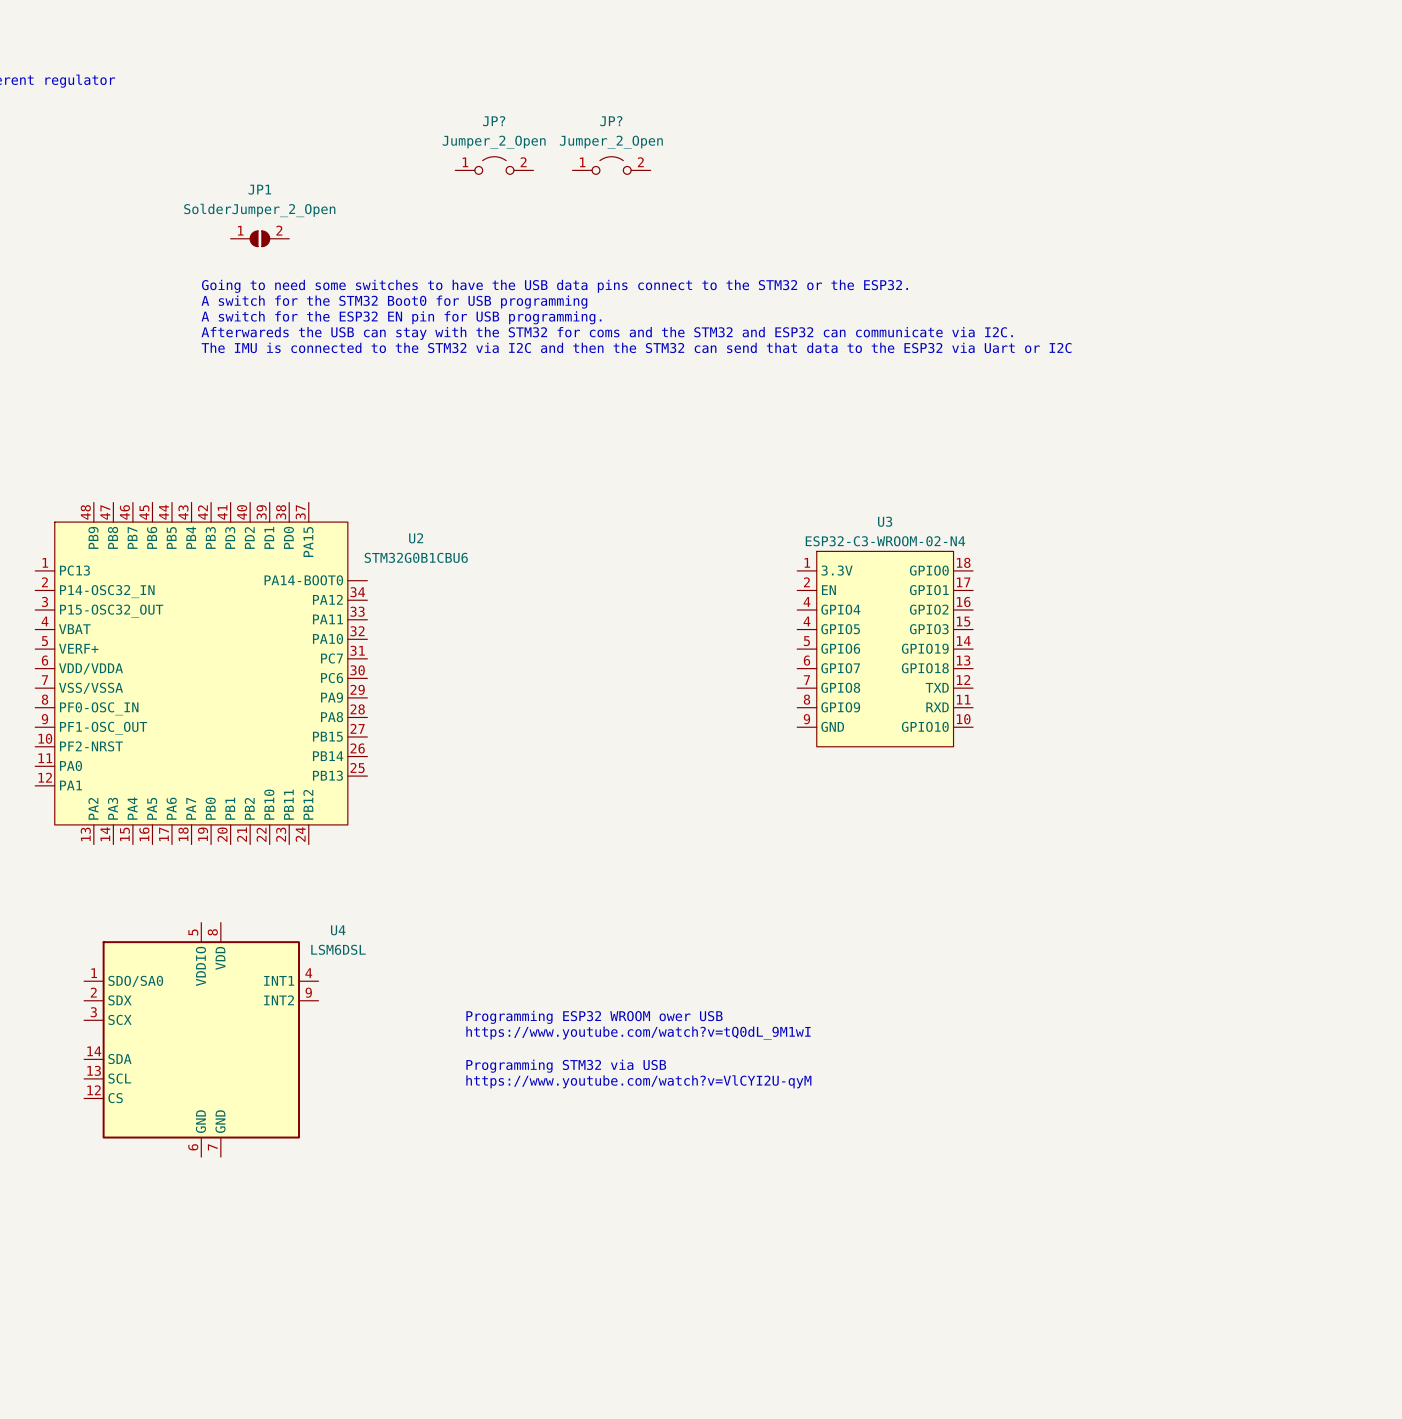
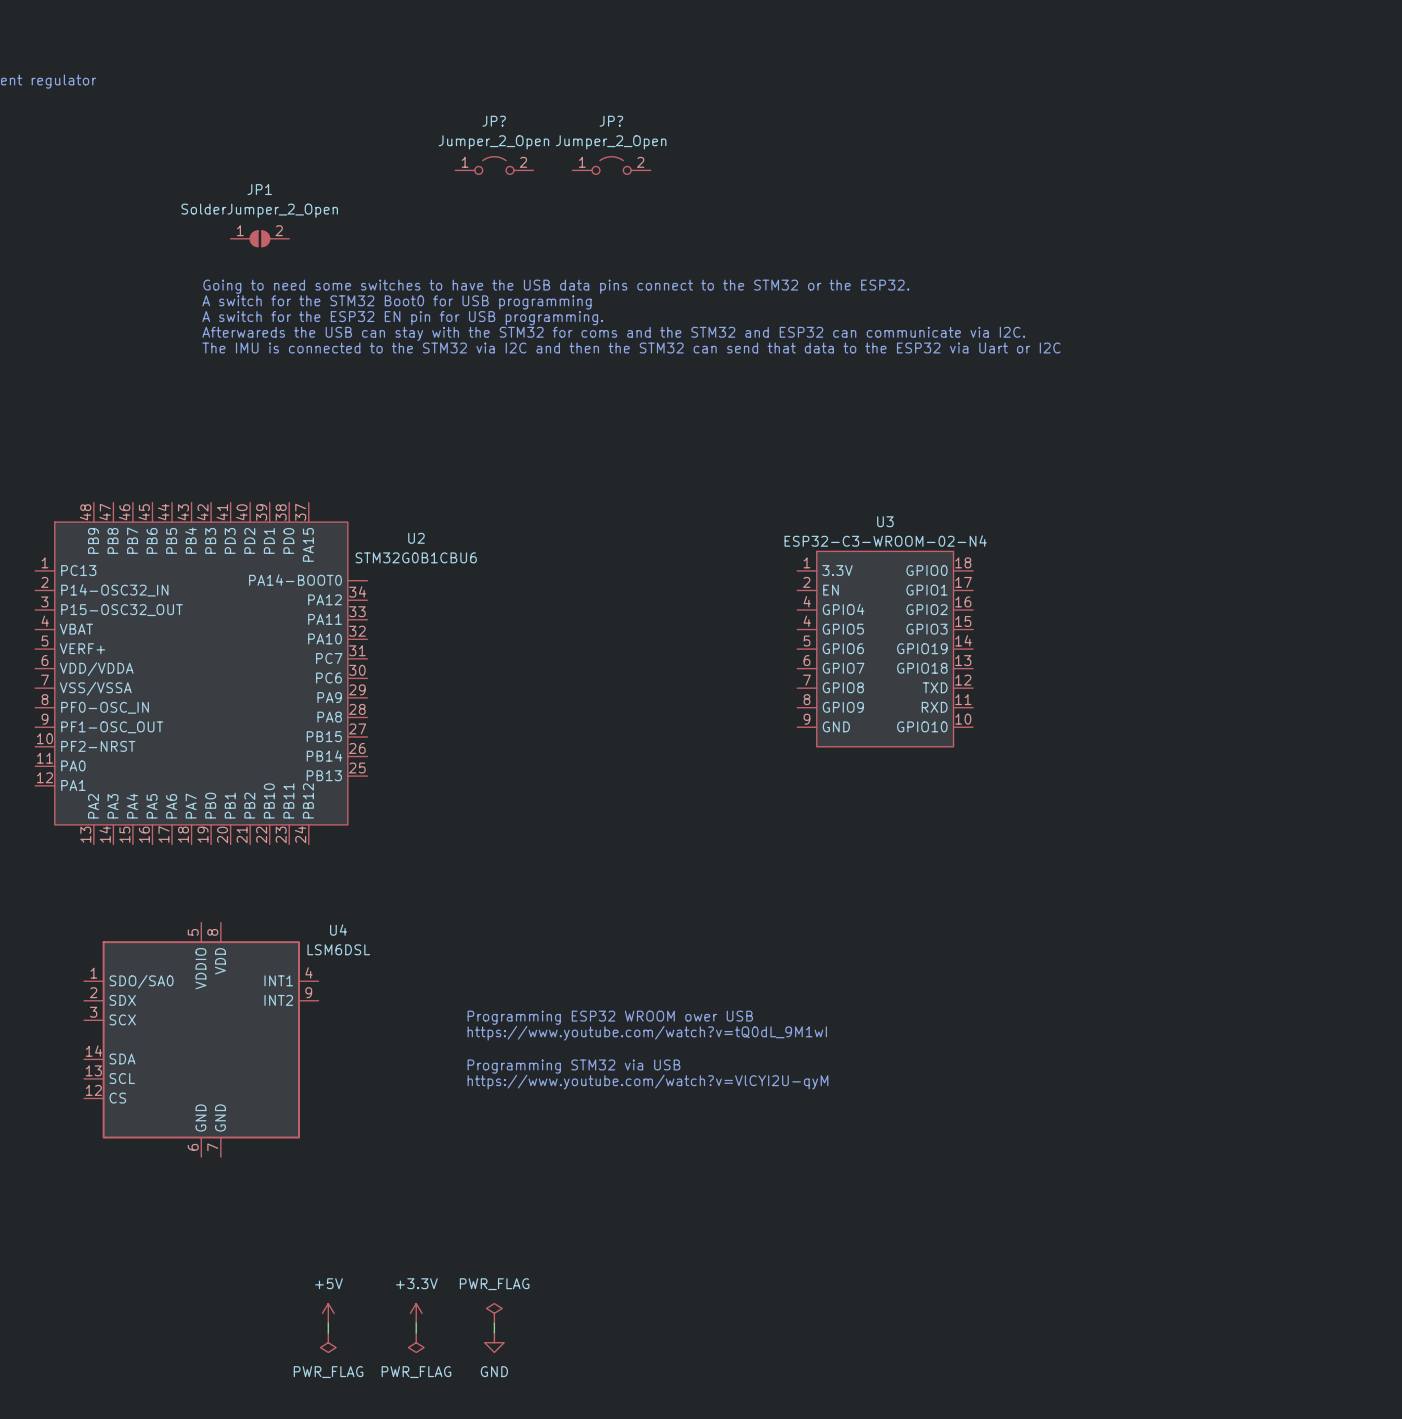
power symbol: none -> +5V (328, 1313)
power symbol: none -> +3.3V (416, 1313)
power symbol: none -> PWR_FLAG (494, 1313)
wire: none -> (328, 1323) (328, 1332)
wire: none -> (416, 1323) (416, 1332)
wire: none -> (494, 1323) (494, 1332)
power symbol: none -> PWR_FLAG (328, 1342)
power symbol: none -> PWR_FLAG (416, 1342)
power symbol: none -> GND (494, 1342)

